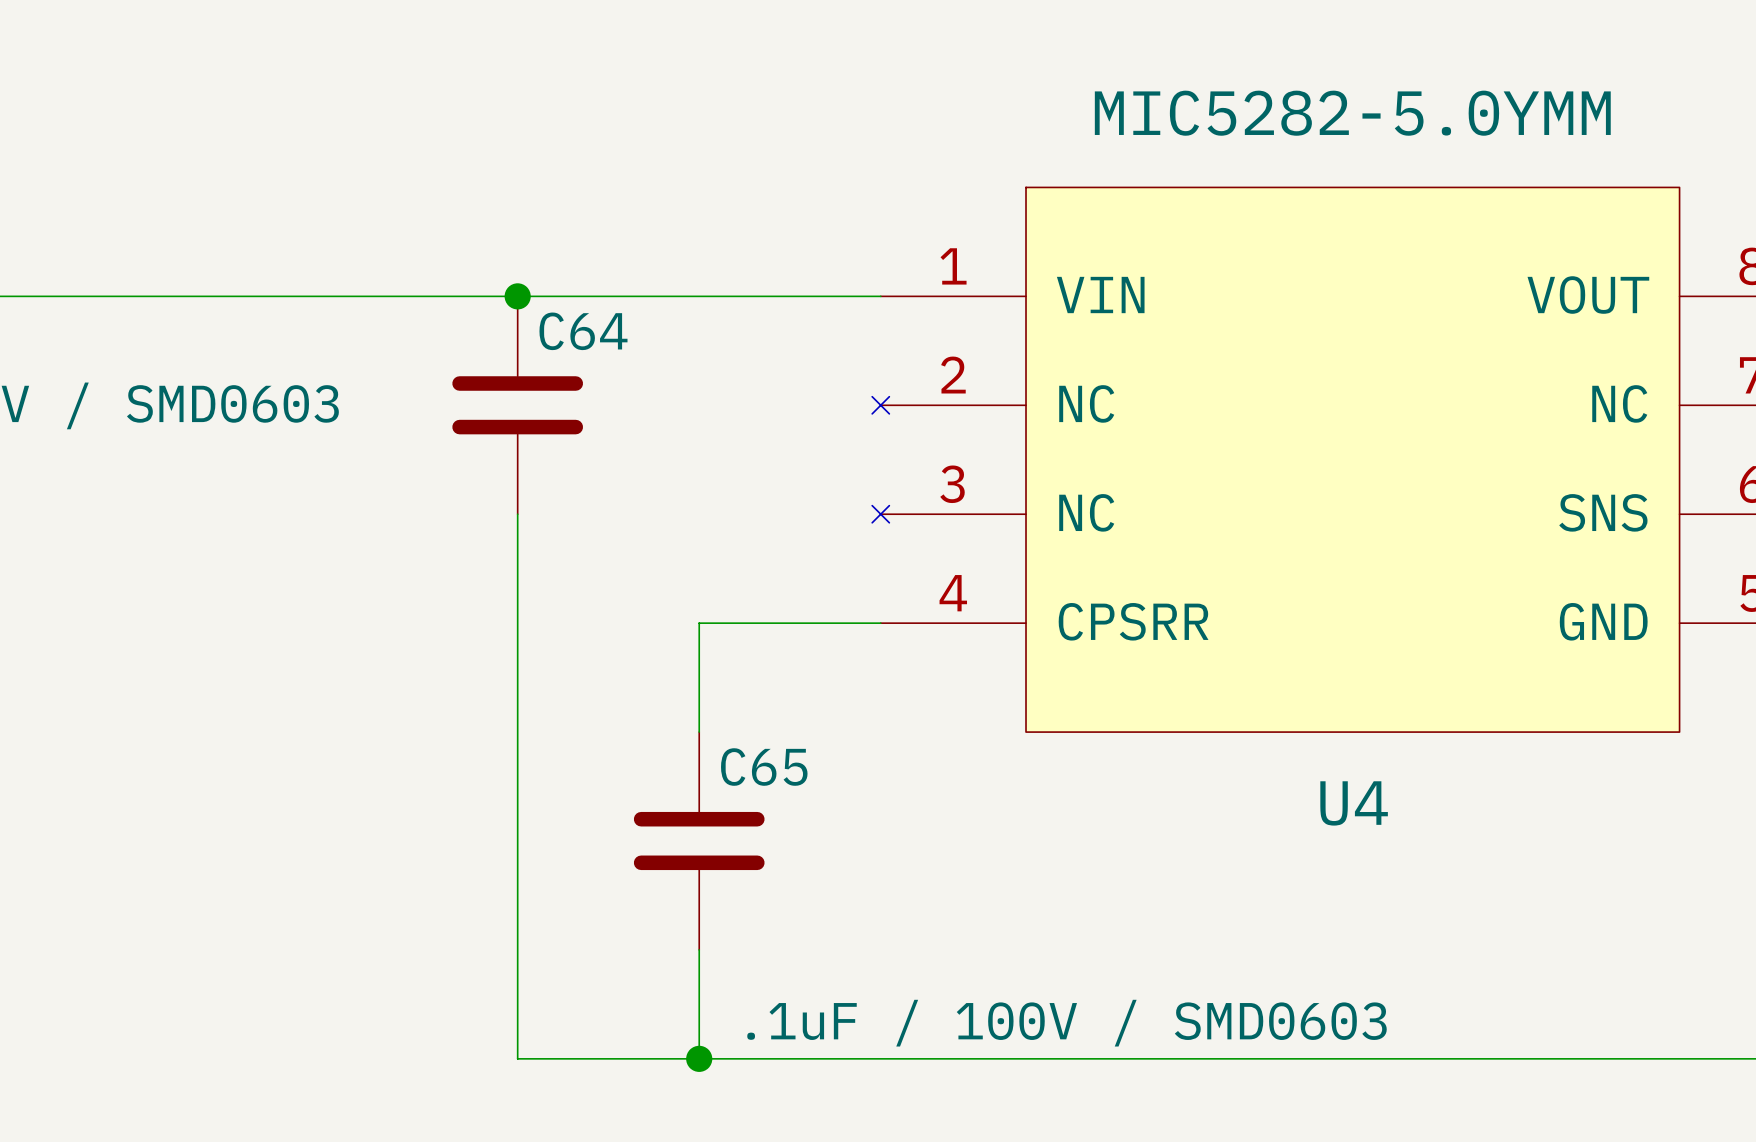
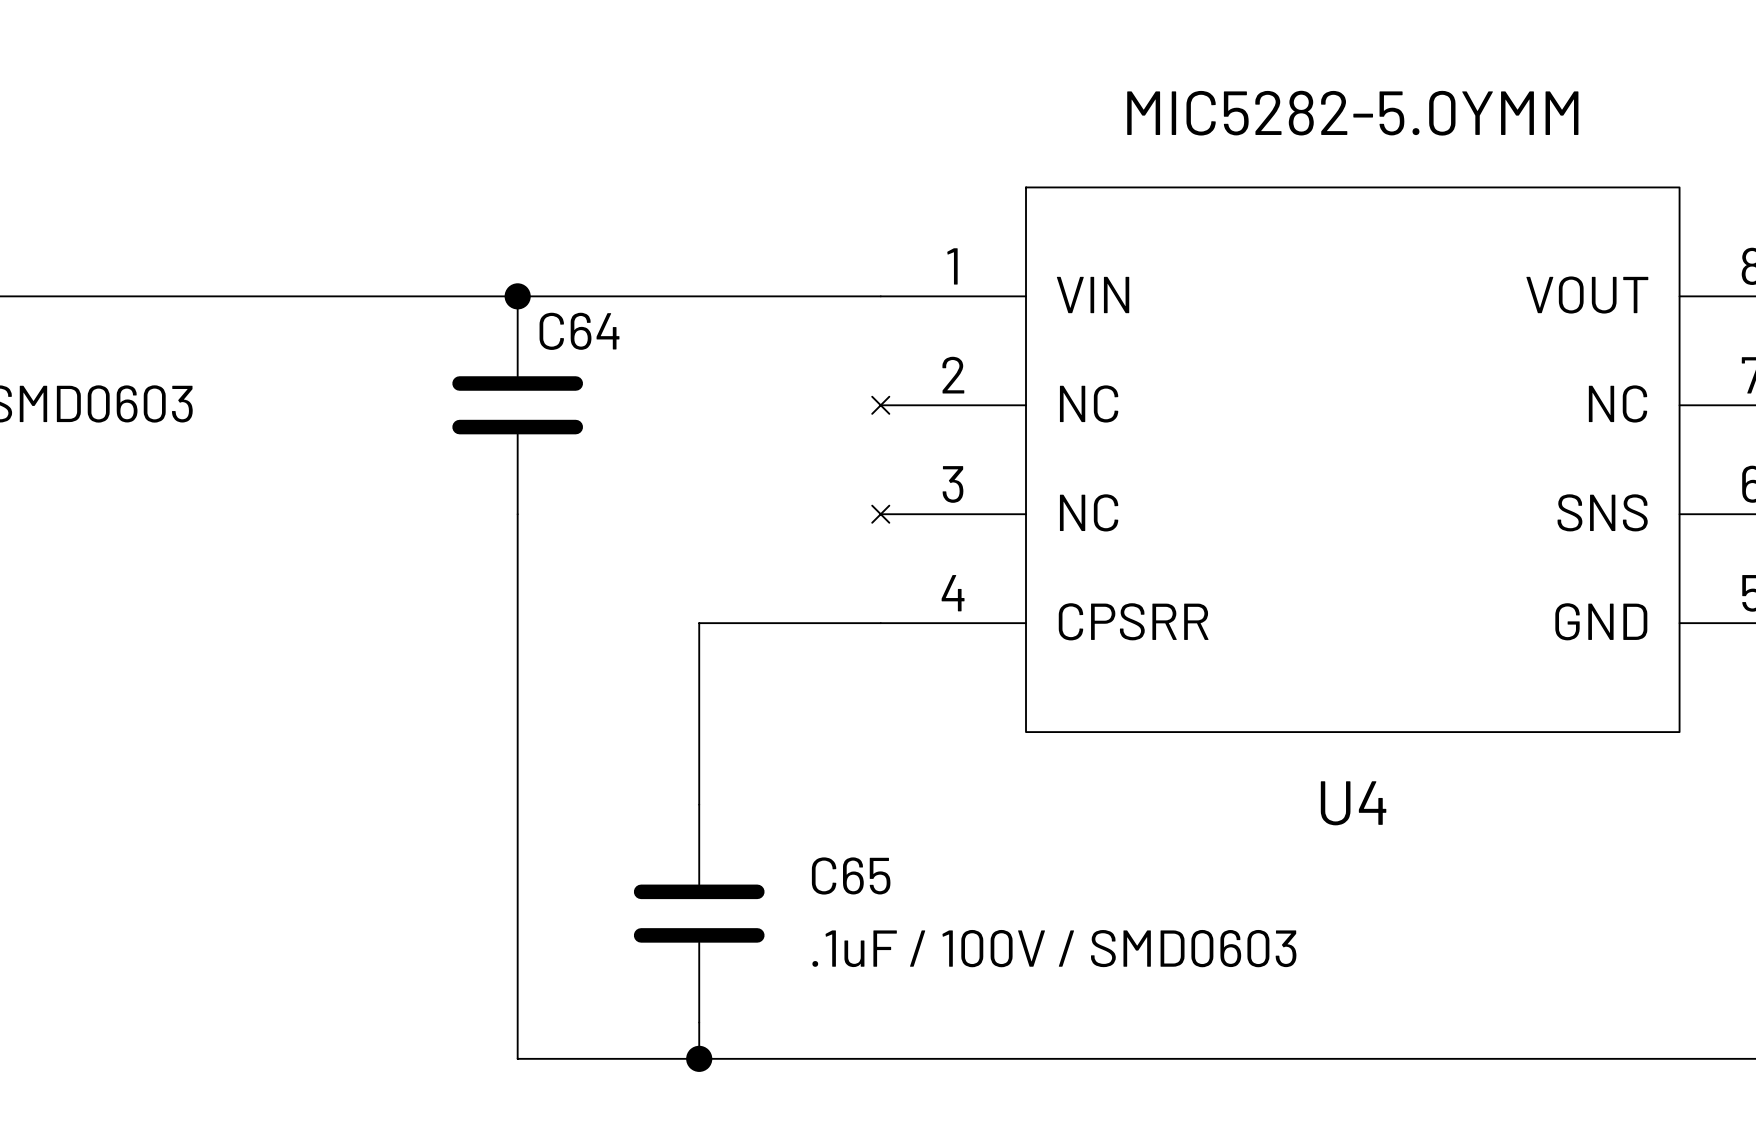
C65 name position: C65 (764, 767) -> C65 (851, 875)
C65 position: (699, 841) -> (699, 913)
C65 value position: .1uF / 100V / SMD0603 (1067, 1023) -> .1uF / 100V / SMD0603 (1054, 948)

